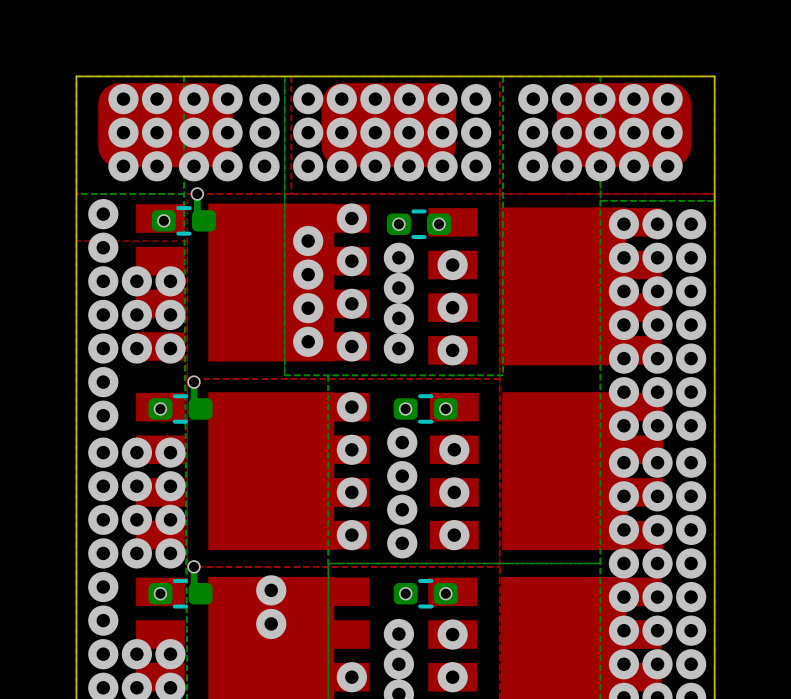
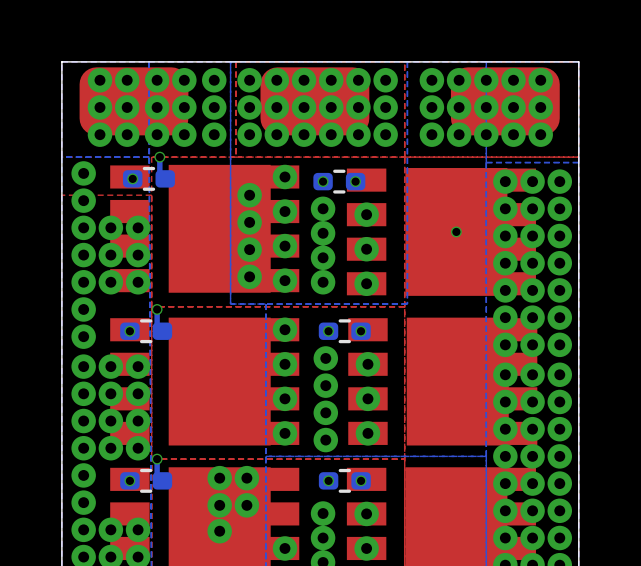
via: none -> (456, 231)
via: none -> (246, 478)
via: none -> (246, 505)
via: none -> (219, 531)

